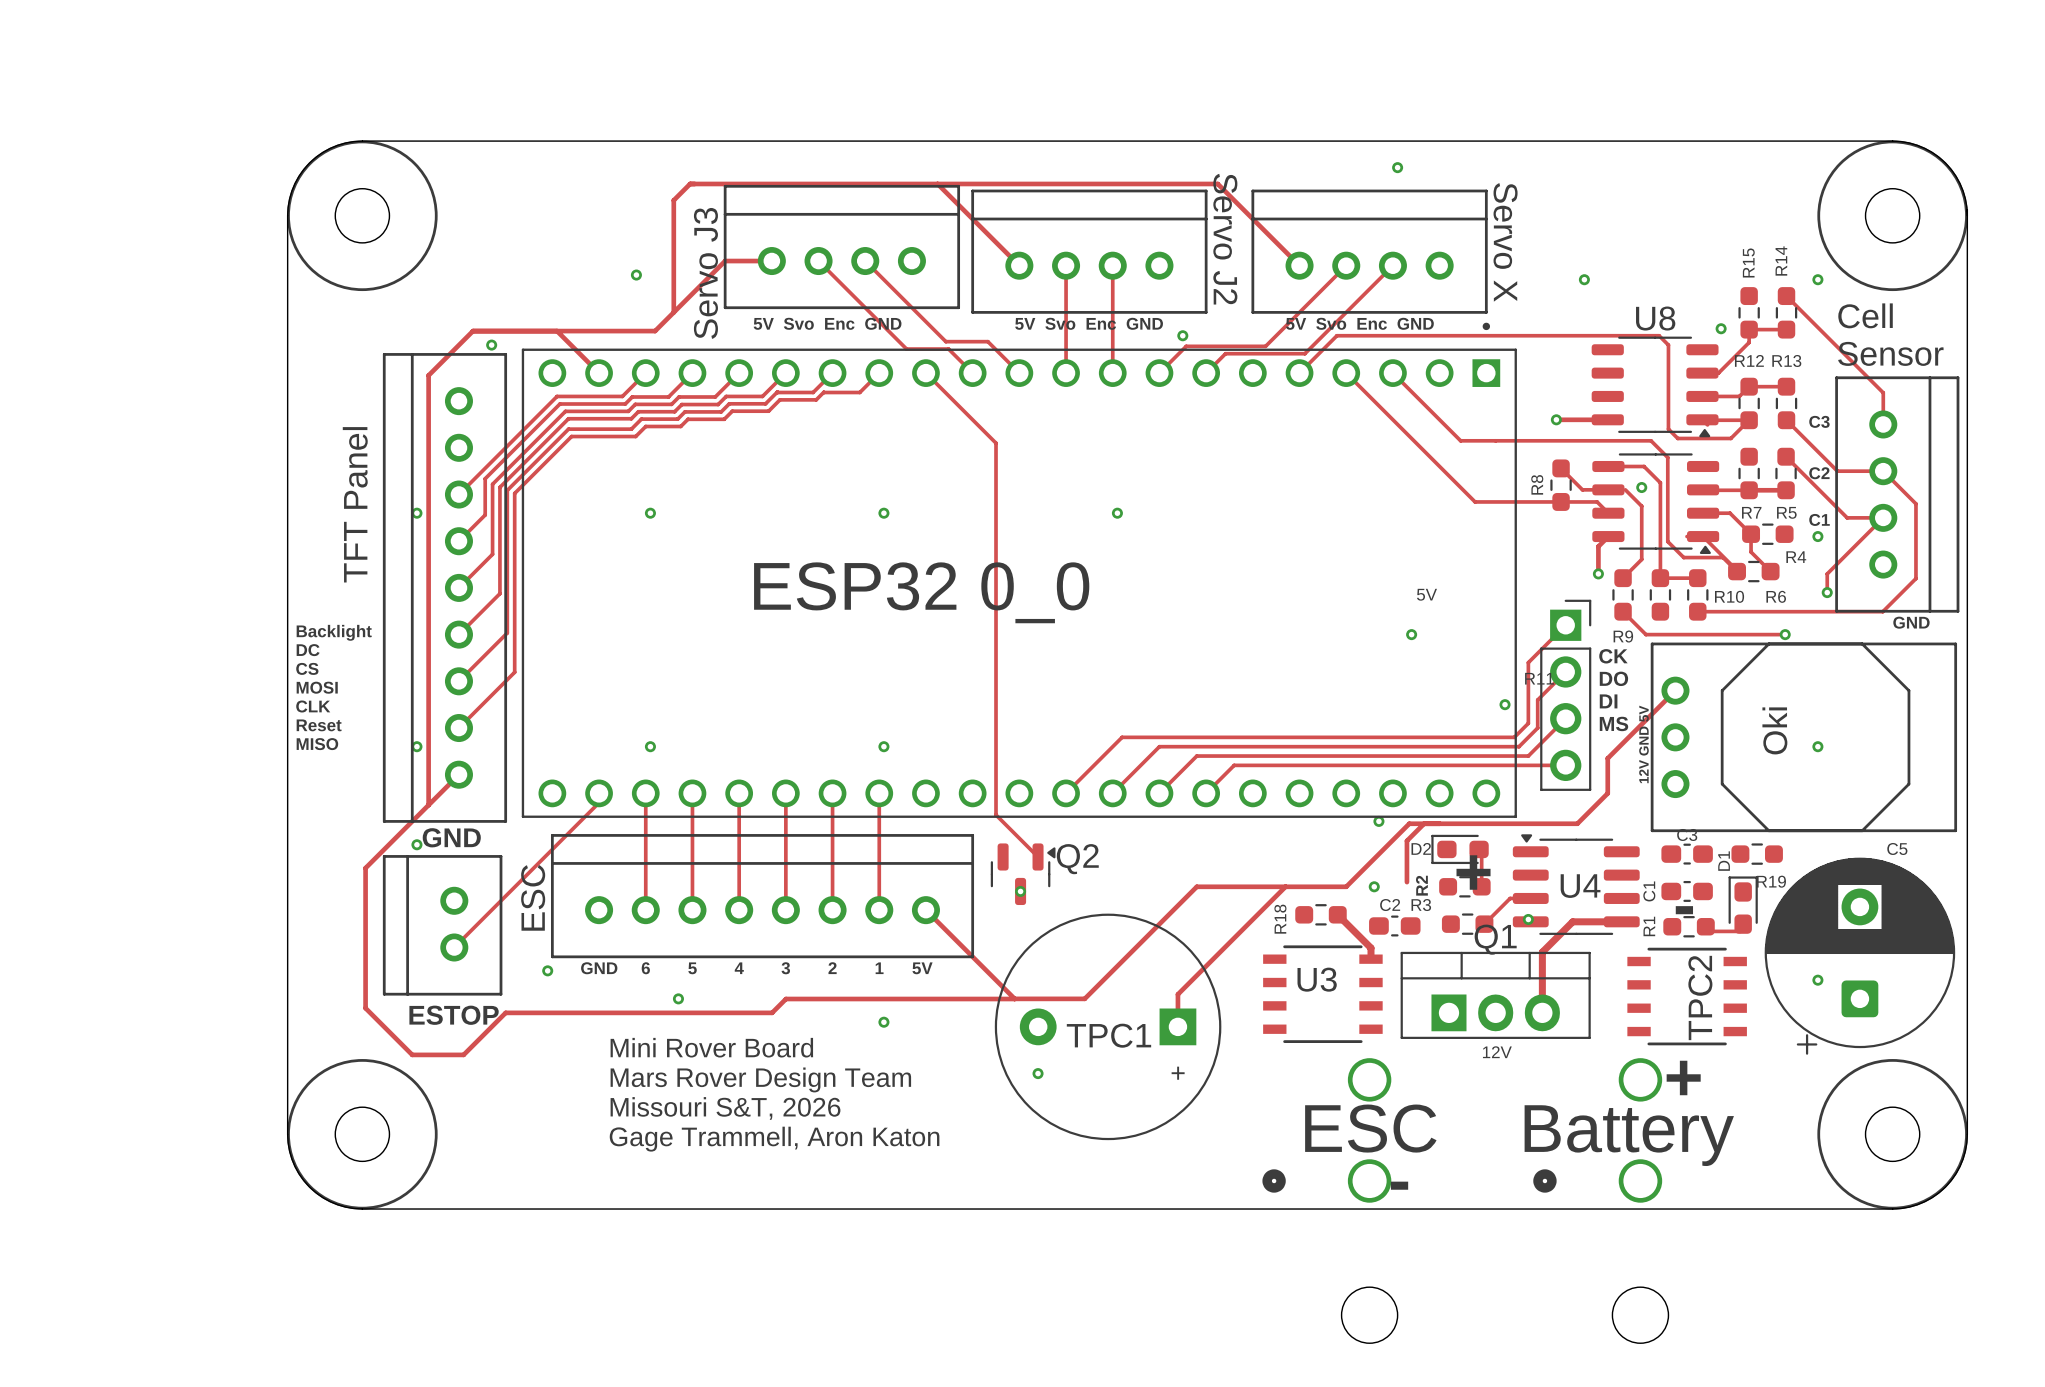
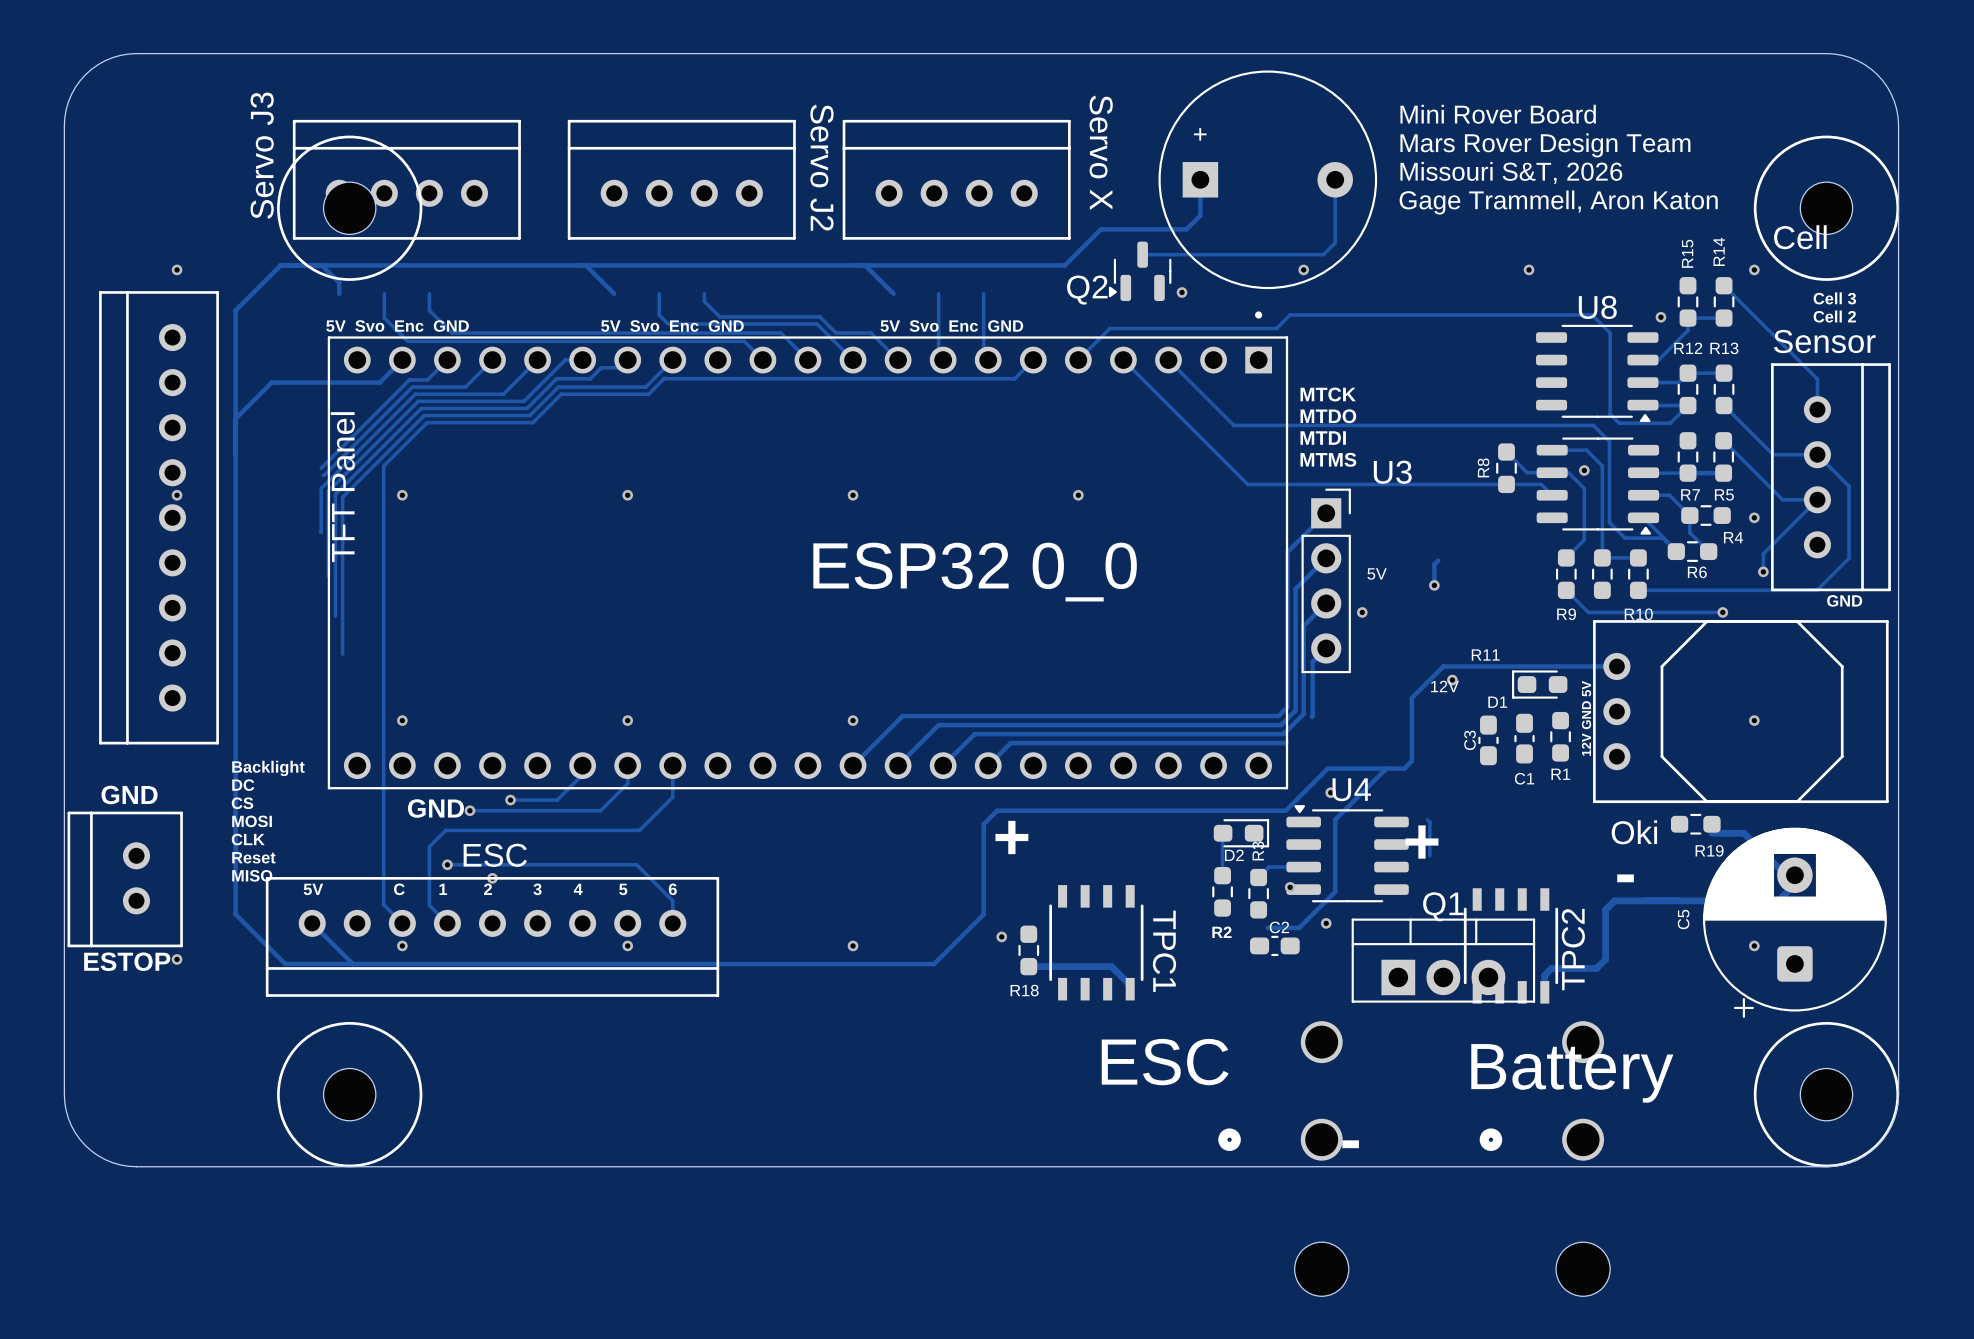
text: none -> Mini Rover Board (1498, 114)
board edge: (362, 141) (337, 145) (322, 152) (309, 162) (299, 176) (291, 191) (287, 215) (288, 1142) (295, 1166) (309, 1187) (329, 1201) (345, 1207) (362, 1209) -> (1898, 202) (1898, 117) (1891, 94) (1882, 80) (1871, 69) (1850, 57) (1834, 54) (136, 53) (112, 57) (98, 64) (85, 74) (71, 94) (66, 109) (64, 125) (64, 1094) (66, 1110) (71, 1125) (85, 1145) (98, 1155) (120, 1164) (136, 1166) (349, 1166)
board edge: (362, 141) (1892, 141) (1917, 145) (1932, 152) (1945, 162) (1955, 176) (1963, 191) (1967, 215) -> none
text: none -> Mars Rover Design Team (1545, 145)
via: (1397, 167) -> none
text: none -> Missouri S&T, 2026 (1511, 172)
track: (937, 183) (1019, 265) -> none
part: none -> (406, 179)
part: none -> (681, 179)
part: none -> (956, 179)
part: none -> (1267, 179)
track: none -> (1335, 179) (1335, 242) (1323, 254) (1142, 254)
text: none -> Gage Trammell, Aron Katon (1558, 202)
text position: Servo J2 (1225, 239) -> Servo J2 (821, 167)
text position: Servo X (1505, 242) -> Servo X (1101, 152)
part: (841, 247) -> none
part: (1089, 251) -> none
part: (1369, 251) -> none
track: (771, 261) (725, 261) (655, 331) (472, 331) (428, 375) (428, 805) -> none
track: (818, 261) (902, 345) -> (704, 293) (704, 301) (719, 316) (819, 316) (836, 333) (871, 333)
track: (865, 261) (945, 341) (987, 341) (1019, 373) -> none
track: (1066, 265) (1066, 373) -> none
track: (1112, 265) (1112, 373) -> none
track: (1299, 265) (1217, 183) (690, 183) (673, 200) (673, 312) -> none
track: (1346, 265) (1265, 346) (1186, 346) (1159, 373) -> none
track: (1392, 265) (1304, 353) (1225, 353) (1206, 373) (1210, 373) -> none
text position: Servo J3 (705, 273) -> Servo J3 (262, 155)
track: none -> (321, 265) (339, 282) (339, 293)
track: none -> (585, 265) (614, 293)
via: (636, 275) -> none
track: none -> (865, 265) (893, 293)
via: none -> (177, 269)
via: none -> (1303, 269)
track: none -> (384, 293) (384, 317) (407, 341) (744, 341) (762, 360)
track: none -> (429, 293) (429, 310) (451, 333) (780, 333) (807, 360)
track: none -> (659, 293) (659, 314) (668, 324) (816, 324) (853, 360)
track: none -> (938, 293) (938, 355) (943, 360)
track: none -> (983, 293) (983, 355) (988, 360)
text: none -> Cell 3 (1834, 298)
text position: Cell (1865, 315) -> Cell (1800, 237)
text: 5V Svo Enc GND (827, 323) -> none
text: 5V Svo Enc GND (1089, 323) -> none
text: 5V Svo Enc GND (1359, 323) -> none
text: none -> Cell 2 (1834, 316)
track: (557, 331) (599, 373) -> none
via position: (1182, 335) -> (1182, 292)
track: (1659, 335) (1336, 335) (1299, 373) -> (1601, 324) (1592, 314) (1290, 314) (1276, 328) (1109, 328) (1078, 360)
text: none -> 5V Svo Enc GND (397, 326)
text: none -> 5V Svo Enc GND (672, 326)
text: none -> 5V Svo Enc GND (951, 326)
via: (491, 345) -> none
track: (906, 349) (948, 349) (972, 373) -> (874, 336) (898, 360)
track: none -> (402, 360) (379, 382) (271, 382) (235, 418)
track: none -> (447, 360) (427, 379) (409, 379) (321, 468)
track: none -> (492, 360) (465, 387) (412, 387) (323, 475)
track: none -> (537, 360) (503, 394) (415, 394) (321, 488) (320, 532)
track: none -> (582, 360) (565, 360) (524, 401) (418, 401) (328, 491) (328, 576)
track: (645, 373) (622, 396) (557, 396) (458, 494) -> none
track: none -> (627, 360) (619, 367) (601, 367) (590, 378) (556, 378) (526, 408) (421, 408) (335, 494) (335, 616)
track: (692, 373) (668, 397) (632, 397) (625, 404) (559, 404) (485, 478) (485, 514) (458, 541) -> none
track: none -> (672, 360) (645, 387) (558, 387) (529, 415) (424, 415) (342, 497) (342, 654)
track: (739, 373) (715, 397) (679, 397) (671, 404) (635, 404) (628, 411) (565, 411) (492, 484) (492, 554) (458, 587) -> none
track: (785, 373) (762, 396) (726, 396) (718, 404) (681, 404) (674, 411) (638, 411) (631, 418) (568, 418) (499, 487) (499, 593) (458, 634) -> none
track: (832, 373) (813, 392) -> (795, 378) (784, 378)
track: (879, 373) (859, 392) -> (1033, 360) (1014, 378) (829, 378)
track: (925, 373) (996, 443) (996, 814) (1038, 856) -> none
track: (1346, 373) (1475, 501) -> (1123, 360) (1247, 484) (1423, 484)
track: (1392, 373) (1460, 440) -> (1168, 360) (1233, 425) (1409, 425)
track: (777, 392) (765, 403) (729, 403) (721, 411) (684, 411) (677, 419) (641, 419) (631, 429) (568, 429) (507, 490) (507, 632) (458, 681) -> (750, 378) (664, 378) (648, 394) (561, 394) (532, 422) (427, 422) (383, 466) (383, 904) (402, 923)
track: (823, 392) (816, 399) (779, 399) (768, 411) (732, 411) (724, 419) (687, 419) (680, 426) (645, 426) (635, 436) (571, 436) (514, 493) (514, 672) (458, 728) -> none
text: none -> MTCK (1328, 394)
track: (1556, 419) (1607, 419) -> none
via: (1556, 419) -> none
text: C3 (1819, 421) -> none
text: none -> MTDO (1328, 416)
text: none -> MTDI (1323, 438)
text: C2 (1819, 473) -> none
text: none -> MTMS (1328, 459)
text: none -> U3 (1392, 472)
via: none -> (177, 495)
text: C1 (1819, 519) -> none
track: none -> (1326, 513) (1287, 551) (1287, 707) (1278, 716) (902, 716) (853, 765)
part: none -> (159, 517)
track: (1608, 536) (1598, 546) (1598, 573) -> none
part position: (1019, 570) -> (807, 550)
via: (1598, 573) -> none
track: none -> (1326, 558) (1295, 588) (1295, 710) (1281, 725) (938, 725) (898, 765)
track: none -> (1438, 560) (1434, 564) (1434, 585)
part: (444, 587) -> none
text position: ESP32 0_0 (921, 592) -> ESP32 0_0 (975, 572)
R10 name position: R10 (1729, 596) -> R10 (1638, 614)
R6 name position: R6 (1776, 596) -> R6 (1697, 572)
via: none -> (1434, 585)
track: none -> (1326, 603) (1303, 625) (1303, 713) (1283, 734) (974, 734) (943, 765)
track: (1565, 625) (1528, 662) (1528, 723) (1514, 737) (1122, 737) (1066, 793) -> none
text position: Backlight (334, 632) -> Backlight (268, 768)
text position: DC (308, 650) -> DC (243, 785)
text: CK (1613, 656) -> none
text position: CS (307, 668) -> CS (242, 803)
track: none -> (1326, 648) (1312, 662) (1311, 717)
track: (1565, 671) (1537, 699) (1537, 728) (1519, 746) (1159, 746) (1112, 793) -> none
text: DO (1613, 678) -> none
text position: MOSI (317, 687) -> MOSI (252, 821)
track: (1675, 690) (1607, 758) (1607, 793) (1577, 823) (1409, 823) -> (1384, 768) (1360, 794)
part position: (1565, 695) -> (1326, 580)
text: DI (1608, 701) -> none
text position: CLK (313, 706) -> CLK (248, 839)
track: (1565, 718) (1528, 756) (1196, 756) (1159, 793) -> none
text: MS (1613, 723) -> none
text position: Reset (319, 725) -> Reset (253, 857)
text rotation: 0° (1774, 730) -> 90° clockwise (1634, 832)
text position: Oki (1774, 730) -> Oki (1634, 832)
text position: MISO (317, 744) -> MISO (252, 875)
track: (1565, 765) (1234, 765) (1206, 793) -> none
track: none -> (1286, 742) (1010, 743) (988, 765)
track: (458, 774) (365, 868) (365, 1008) (412, 1054) (463, 1054) (505, 1012) (772, 1012) (785, 998) -> (1200, 179) (1200, 215) (1186, 229) (1100, 229) (1064, 265) (280, 265) (235, 310) (235, 914) (285, 963) (758, 964)
track: (599, 793) (599, 802) (454, 947) -> none
track: none -> (582, 765) (582, 774) (557, 800) (510, 800)
track: (645, 793) (645, 910) -> none
track: none -> (627, 765) (627, 783) (600, 810) (469, 810)
track: (692, 793) (692, 910) -> none
track: none -> (672, 765) (672, 797) (639, 830) (445, 830) (429, 846) (429, 905) (447, 923)
track: (739, 793) (739, 910) -> none
track: (785, 793) (785, 910) -> none
track: (832, 793) (832, 910) -> none
track: (879, 793) (879, 910) -> none
text: none -> GND (129, 794)
track: (1424, 823) (1406, 840) (1406, 882) -> none
via: none -> (510, 800)
via: none -> (469, 810)
via: (416, 844) -> none
D2 name position: D2 (1421, 848) -> D2 (1234, 855)
C5 name rotation: 0° (1897, 848) -> 90° counterclockwise (1683, 919)
C5 name position: C5 (1897, 848) -> C5 (1683, 919)
track: (1383, 849) (1346, 886) (1196, 886) (1084, 998) (967, 998) -> (1616, 671) (1612, 666) (1443, 666) (1411, 698) (1411, 761) (1404, 768) (1327, 768) (1285, 810) (997, 810) (983, 824) (983, 914) (934, 964)
track: none -> (1335, 819) (1335, 891) (1299, 927) (1267, 927)
D2 rotation: 0° (1460, 849) -> 180° (1241, 833)
D2 position: (1460, 849) -> (1241, 833)
C3 rotation: 0° (1687, 854) -> 90° clockwise (1488, 740)
C3 position: (1687, 854) -> (1488, 740)
track: none -> (1223, 833) (1222, 875)
track: none -> (1711, 833) (1743, 833) (1794, 884) (1778, 900) (1614, 900) (1605, 909) (1605, 959) (1596, 968) (1551, 968) (1544, 975) (1544, 992)
text: none -> + (1011, 837)
Q2 rotation: 0° (1023, 874) -> 180° (1140, 271)
Q2 position: (1023, 874) -> (1140, 271)
U4 position: (1576, 884) -> (1347, 853)
R2 name position: R2 (1421, 885) -> R2 (1221, 932)
track: (1285, 886) (1177, 994) (1177, 1026) -> none
via: (1374, 886) -> none
R2 rotation: 0° (1464, 886) -> 90° clockwise (1222, 891)
R2 position: (1464, 886) -> (1222, 891)
U4 name position: U4 (1580, 886) -> U4 (1351, 789)
via: (1020, 891) -> none
C1 name position: C1 (1649, 891) -> C1 (1524, 778)
C1 rotation: 0° (1687, 891) -> 90° clockwise (1524, 738)
C1 position: (1687, 891) -> (1524, 738)
track: none -> (447, 864) (636, 864) (672, 900) (672, 923)
via: none -> (447, 864)
part: (762, 896) -> none
text rotation: 0° (533, 897) -> 90° clockwise (495, 855)
track: none -> (1303, 867) (1269, 867) (1258, 877)
track: (1530, 898) (1510, 898) (1484, 924) -> none
C2 name position: C2 (1390, 905) -> C2 (1279, 927)
D1 rotation: 0° (1743, 905) -> 90° counterclockwise (1539, 684)
D1 position: (1743, 905) -> (1539, 684)
via: none -> (492, 878)
track: (925, 910) (1014, 998) -> none
R18 rotation: 0° (1320, 914) -> 90° clockwise (1028, 950)
R18 position: (1320, 914) -> (1028, 950)
track: (1337, 914) (1370, 948) (1370, 959) -> none
R18 name position: R18 (1280, 919) -> R18 (1024, 990)
via: none -> (1290, 887)
via: (1528, 919) -> none
text: none -> 5V (313, 889)
text: none -> C (399, 889)
track: (1621, 921) (1572, 921) (1542, 952) (1542, 1012) -> none
R3 rotation: 0° (1467, 924) -> 90° clockwise (1258, 893)
R3 position: (1467, 924) -> (1258, 893)
part position: (442, 925) -> (125, 879)
C2 position: (1394, 925) -> (1274, 945)
R1 name position: R1 (1649, 926) -> R1 (1560, 774)
R1 rotation: 0° (1689, 926) -> 90° clockwise (1560, 736)
R1 position: (1689, 926) -> (1560, 736)
track: none -> (312, 923) (352, 964)
via: none -> (1326, 923)
text: GND (599, 968) -> none
text position: 6 (645, 968) -> 6 (672, 889)
text position: 5 (692, 968) -> 5 (623, 889)
text position: 4 (739, 968) -> 4 (578, 889)
text position: 3 (785, 968) -> 3 (537, 889)
text position: 2 (832, 968) -> 2 (488, 889)
text position: 1 (879, 968) -> 1 (443, 889)
text: 5V (922, 968) -> none
part: none -> (492, 936)
via: (547, 970) -> none
via: none -> (1001, 936)
part: none -> (1096, 942)
text: U3 (1317, 979) -> none
via: none -> (402, 945)
part: none -> (1511, 945)
via: none -> (177, 959)
part: (1322, 994) -> none
part: (1687, 996) -> none
text position: TPC2 (1700, 997) -> TPC2 (1573, 949)
via position: (678, 998) -> (627, 945)
track: none -> (1028, 966) (1111, 966) (1130, 985) (1130, 989)
text position: ESTOP (454, 1015) -> ESTOP (127, 961)
via position: (883, 1022) -> (853, 945)
part: (1108, 1026) -> none
text rotation: 0° (1108, 1035) -> 90° clockwise (1164, 951)
text: Mini Rover Board (711, 1047) -> none
text position: 12V (1497, 1052) -> 12V (1445, 686)
via: (1038, 1073) -> none
text: + (1683, 1077) -> none
text: Mars Rover Design Team (760, 1079) -> none
text: Missouri S&T, 2026 (725, 1108) -> none
text position: ESC (1370, 1128) -> ESC (1165, 1062)
text position: Battery (1629, 1135) -> Battery (1572, 1073)
text: Gage Trammell, Aron Katon (774, 1139) -> none

